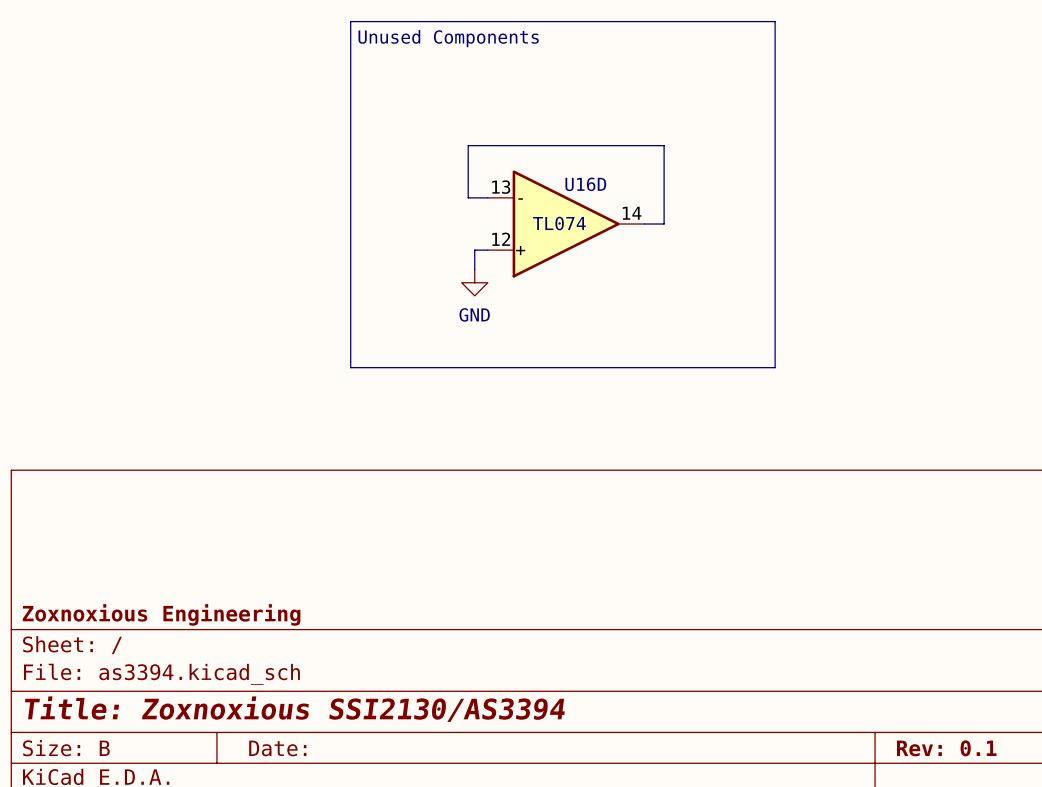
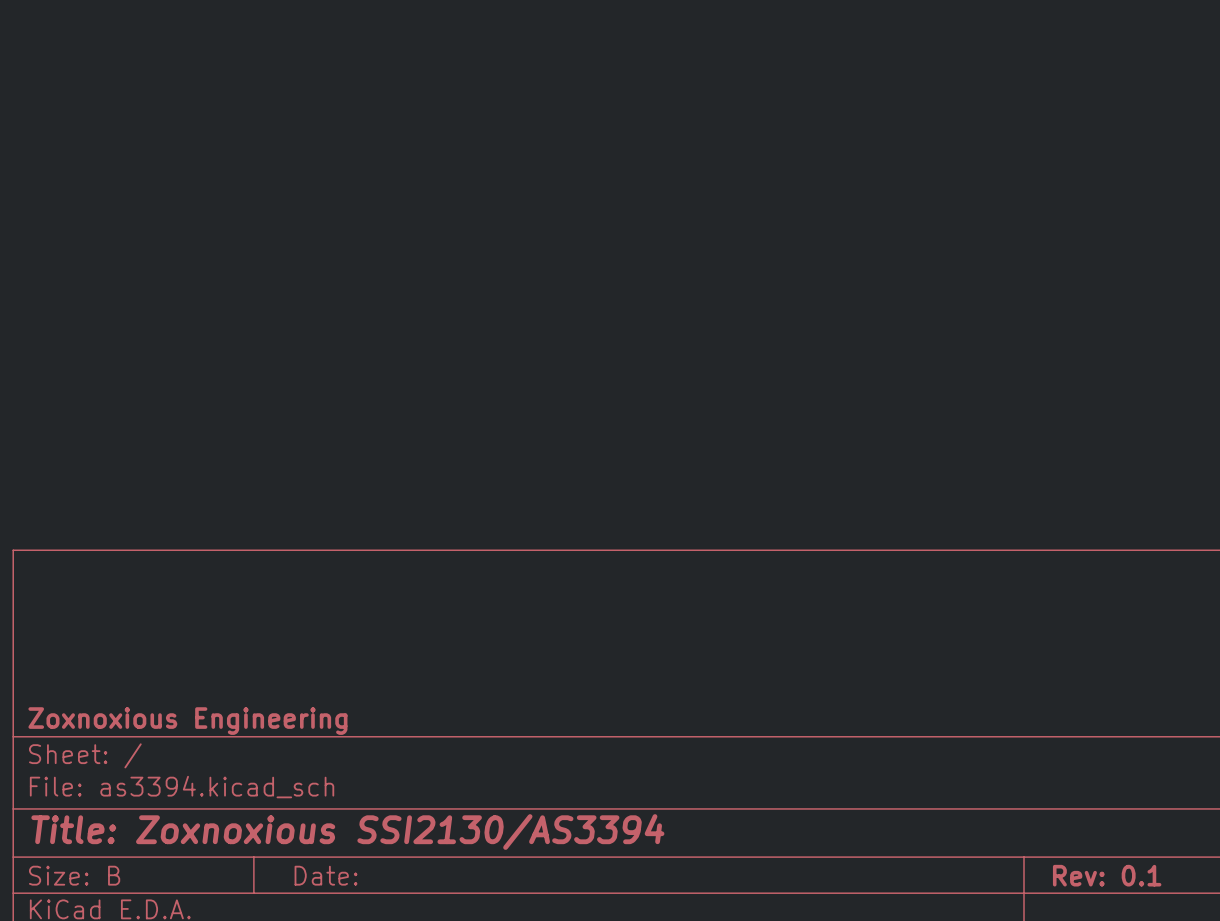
line: (350, 21) (775, 21) (775, 367) (350, 367) (350, 21) -> none
text: Unused Components (448, 38) -> none
wire: (487, 197) (468, 197) (468, 145) (664, 145) (664, 224) (644, 224) -> none
U16D: TL074 (566, 224) -> none
wire: (487, 250) (474, 250) (474, 269) -> none
power symbol: GND (474, 282) -> none

